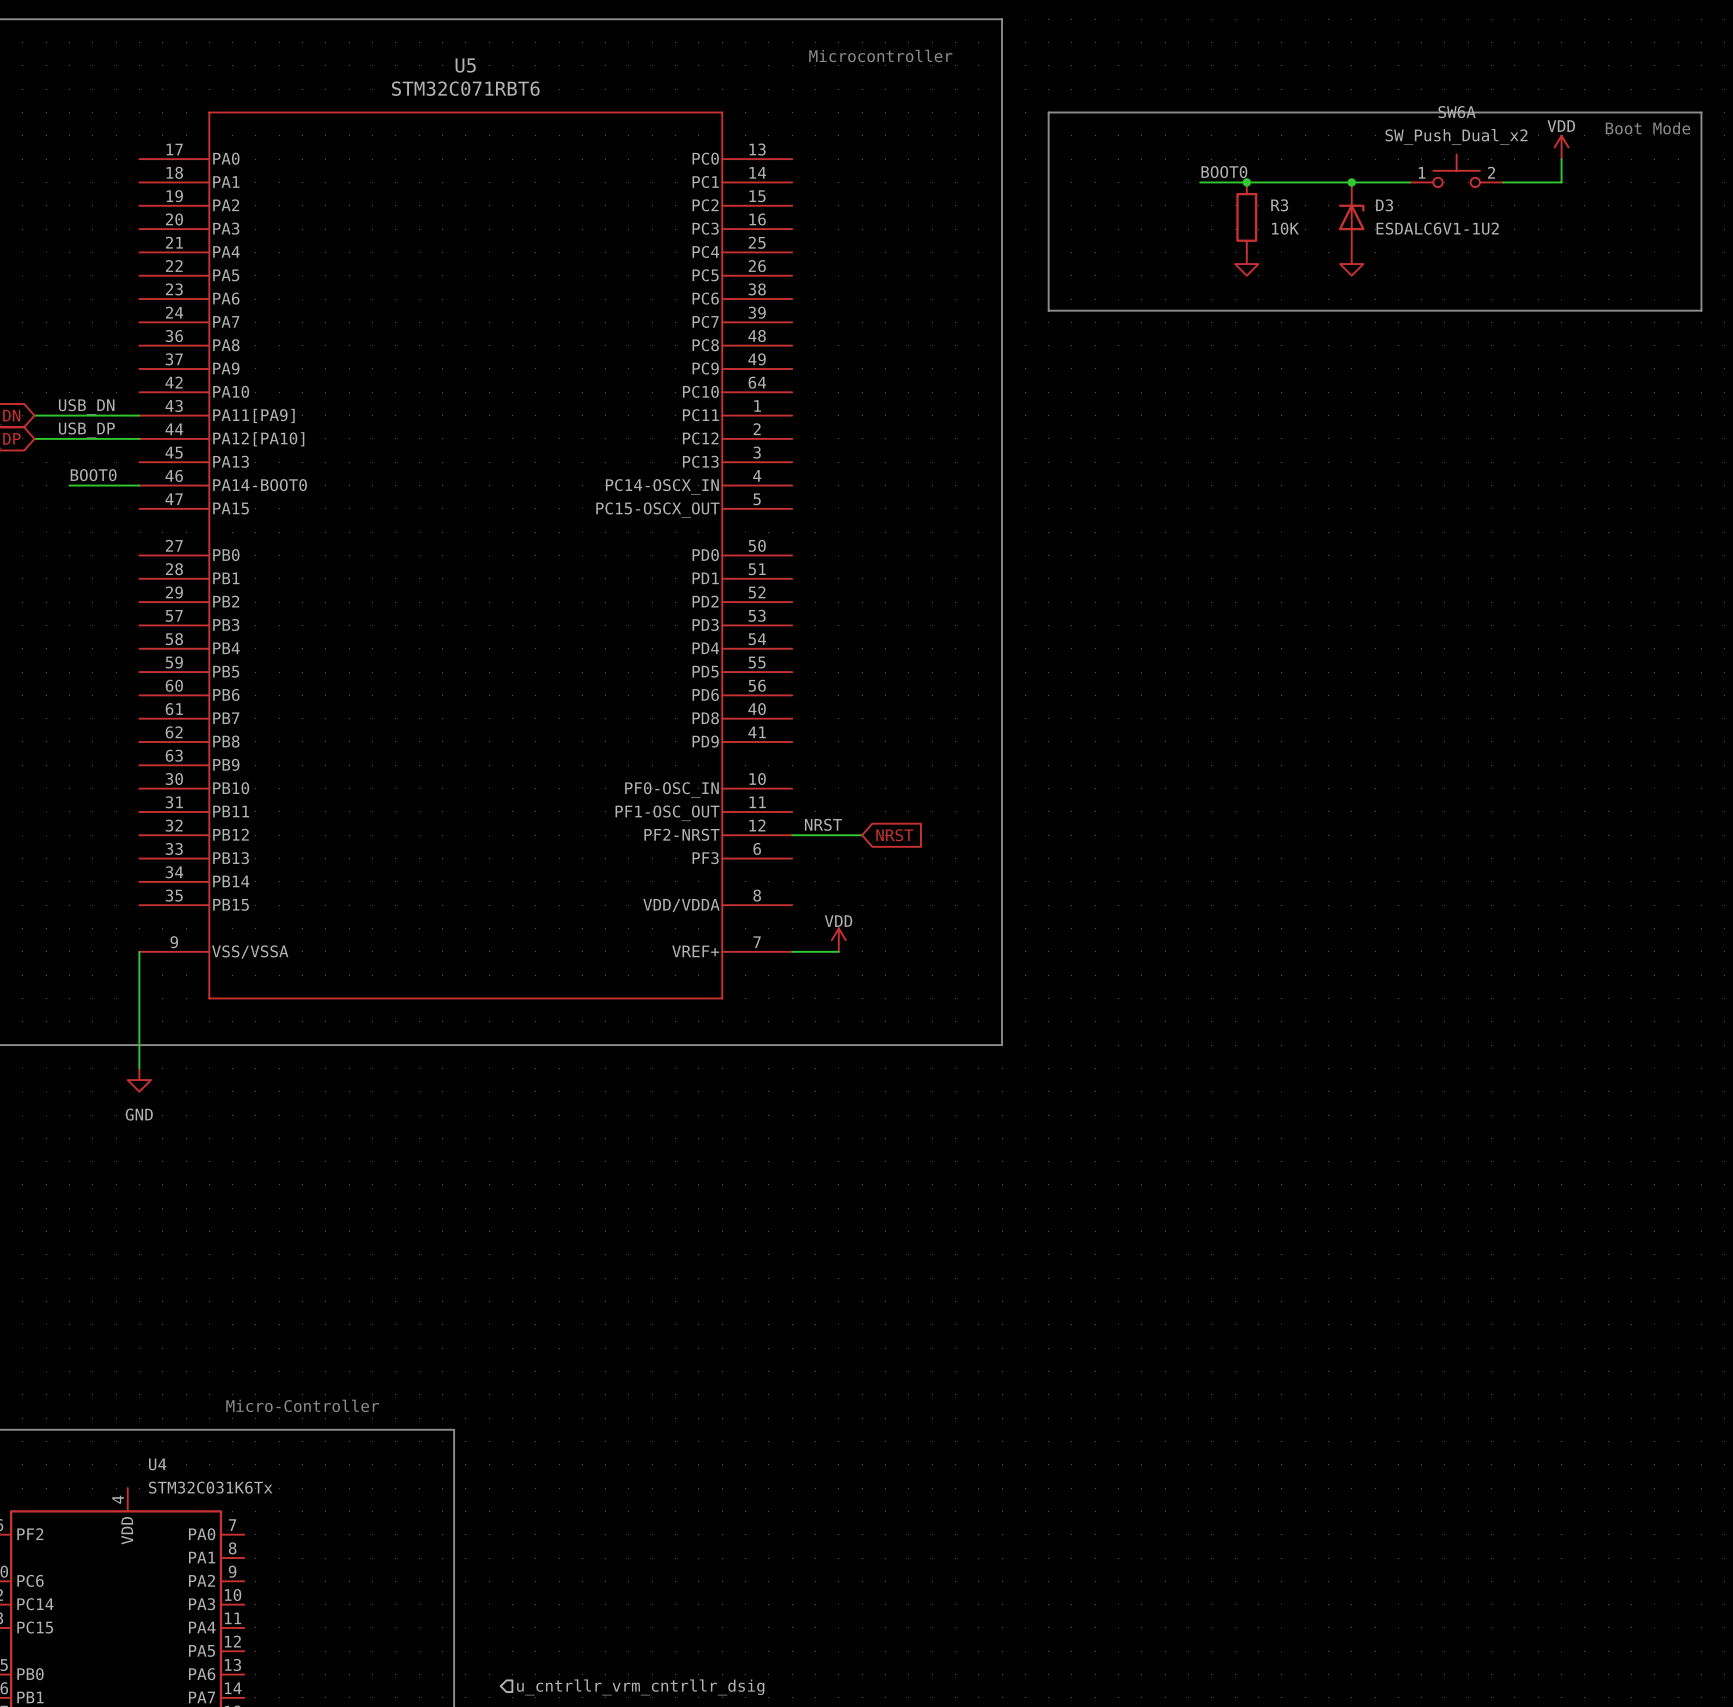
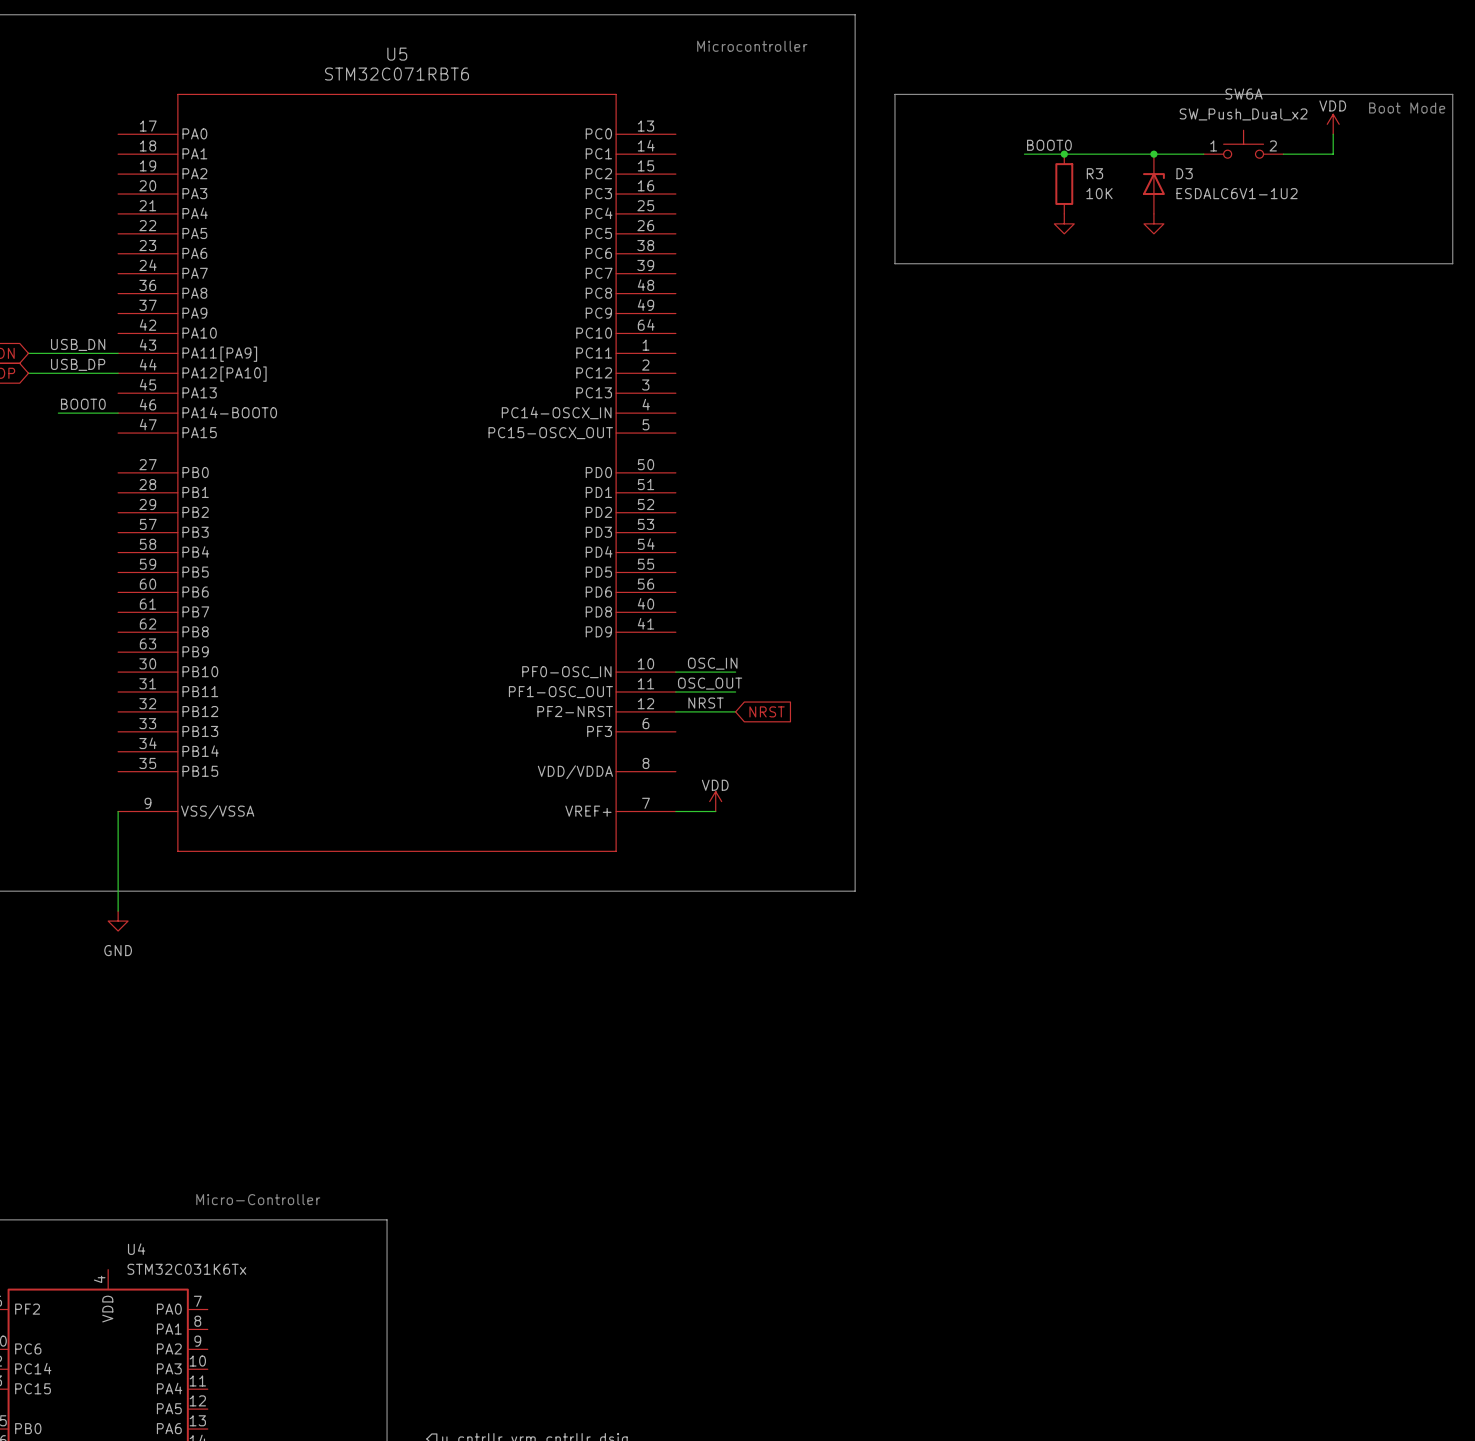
label: none -> OSC_IN (712, 663)
wire: none -> (675, 672) (735, 672)
label: none -> OSC_OUT (710, 683)
wire: none -> (675, 691) (735, 691)

